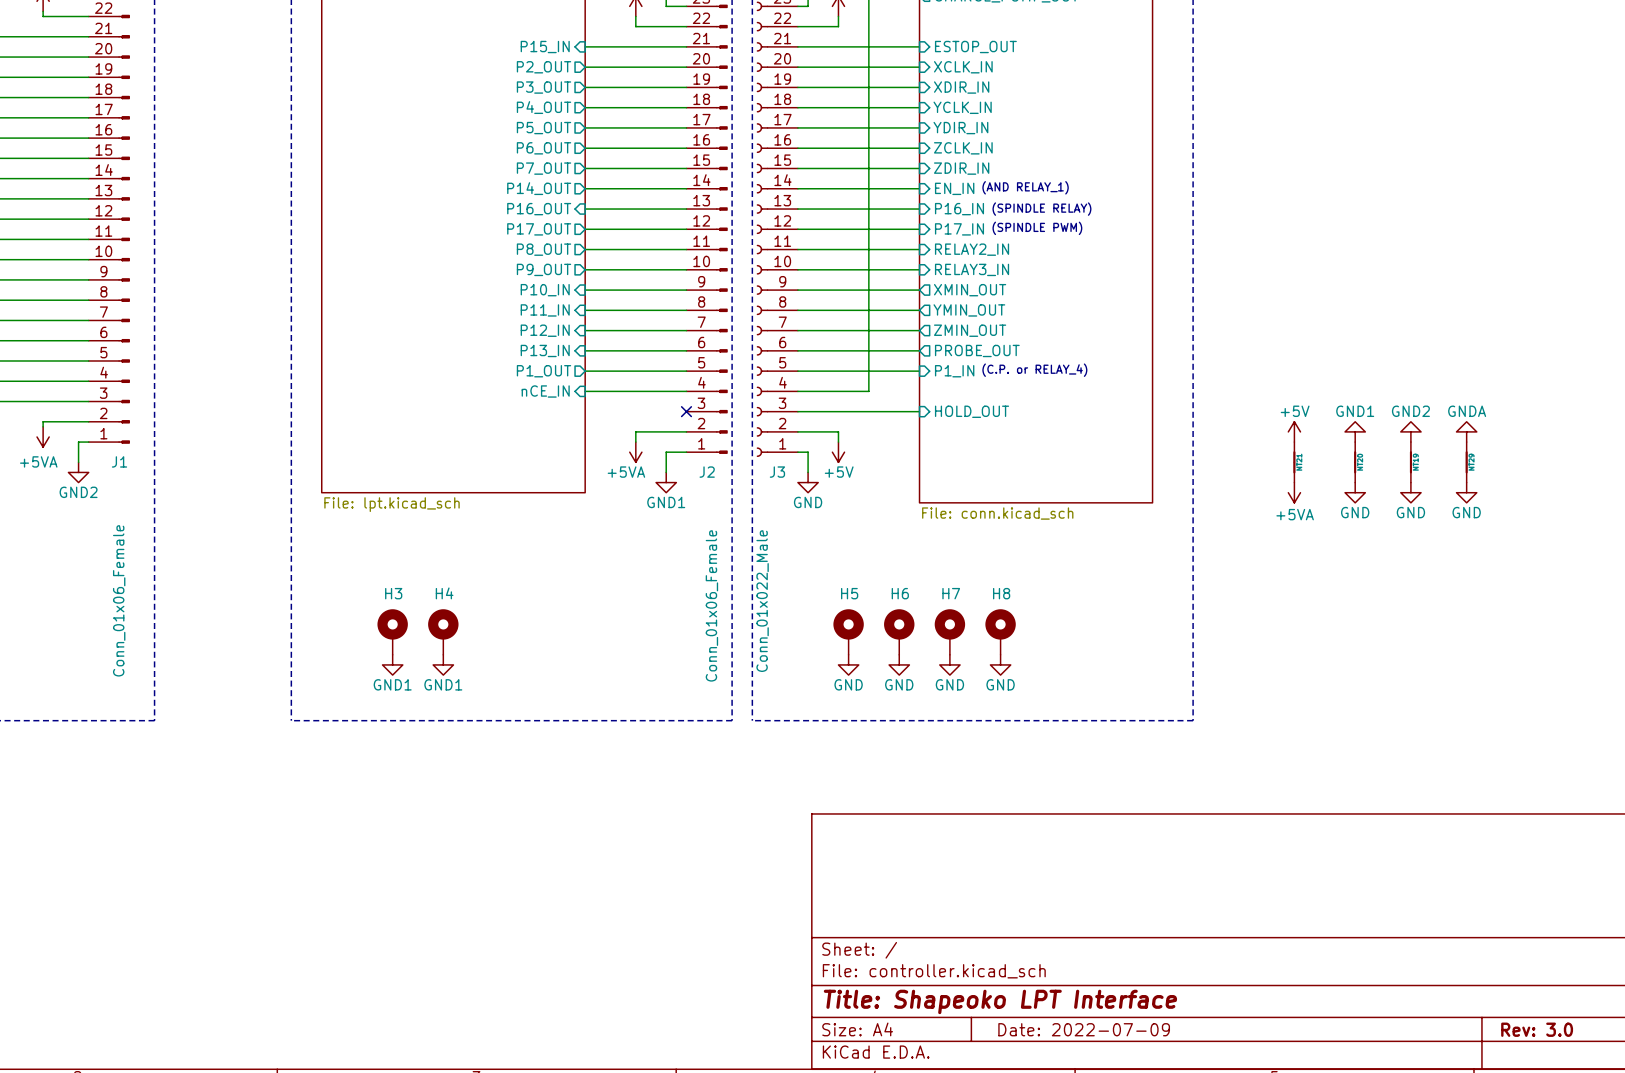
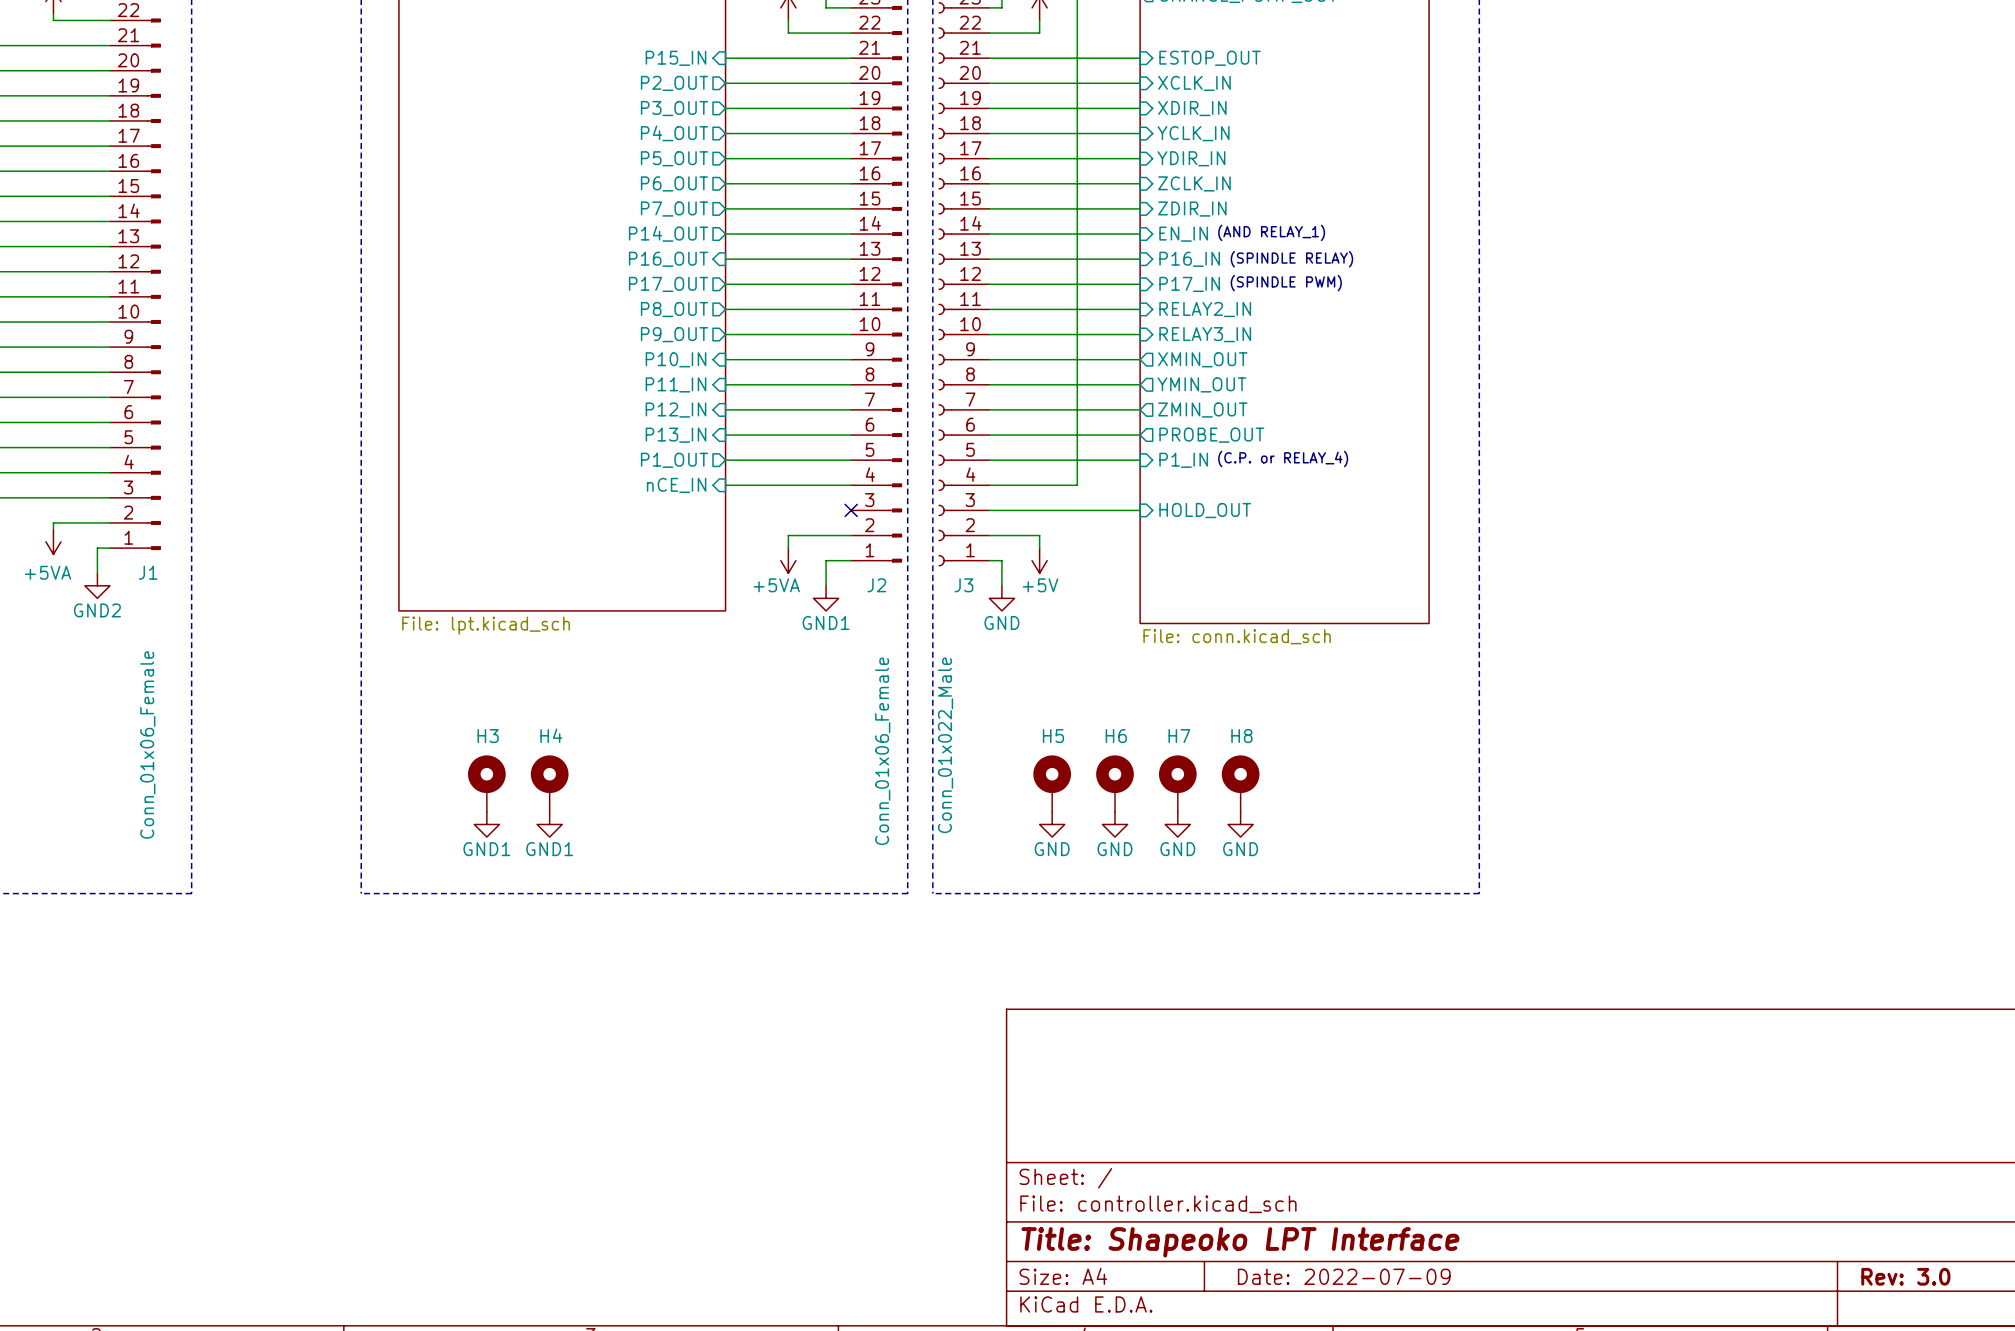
power symbol: +5V (1294, 431) -> none
power symbol: GND1 (1355, 431) -> none
power symbol: GND2 (1410, 431) -> none
power symbol: GNDA (1466, 431) -> none
part: (1294, 462) -> none
part: (1355, 462) -> none
part: (1410, 462) -> none
part: (1466, 462) -> none
power symbol: +5VA (1294, 492) -> none
power symbol: GND (1355, 492) -> none
power symbol: GND (1410, 492) -> none
power symbol: GND (1466, 492) -> none

